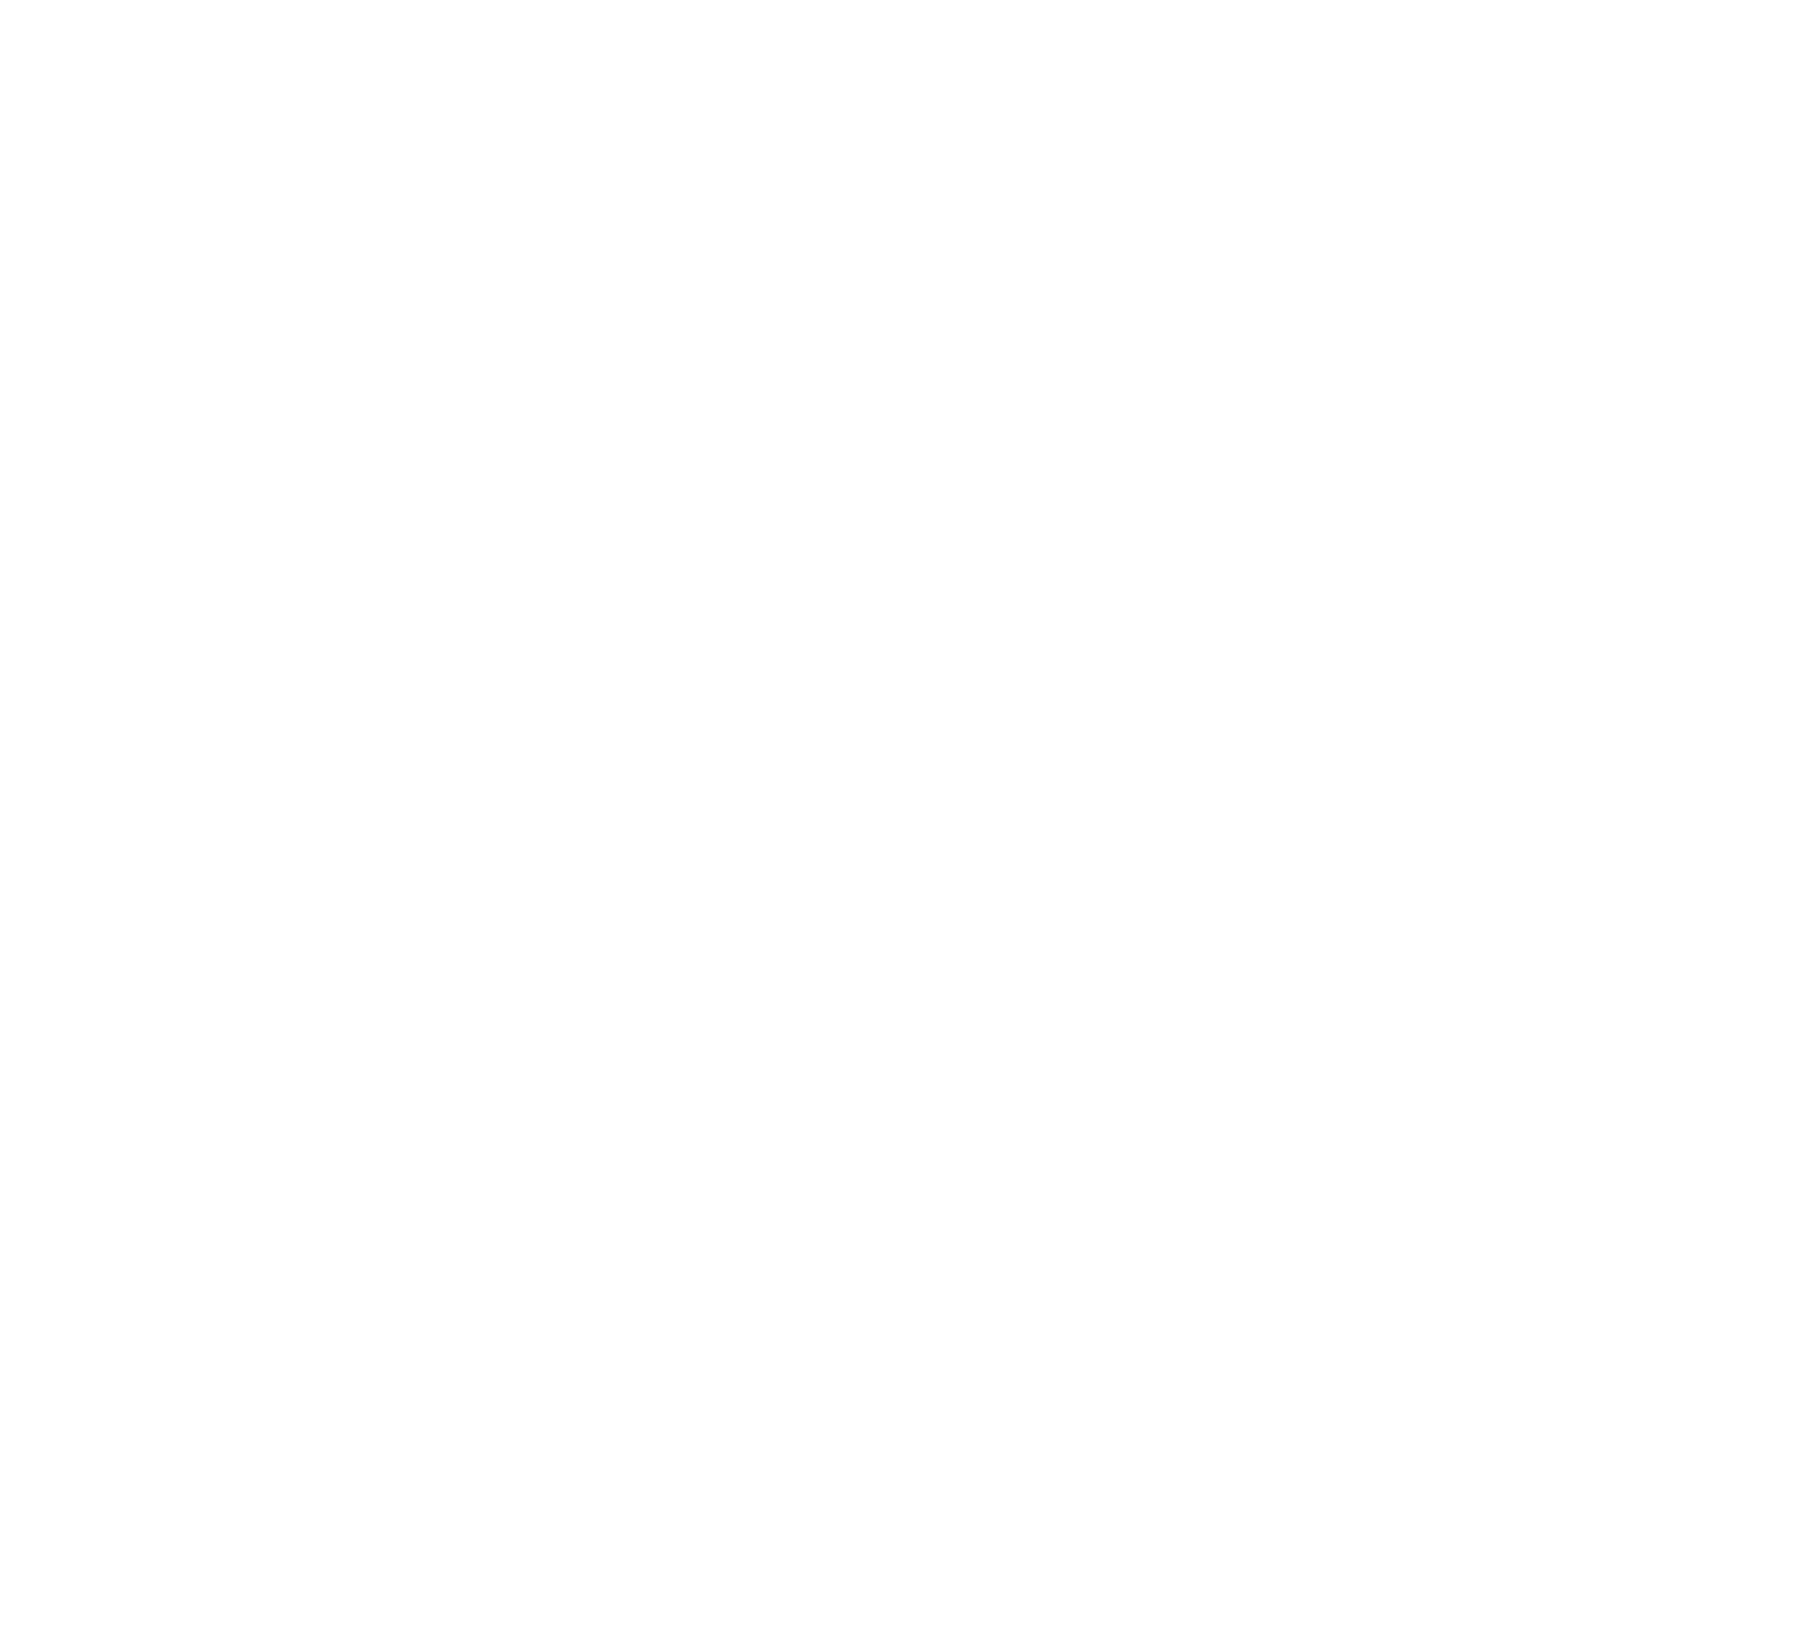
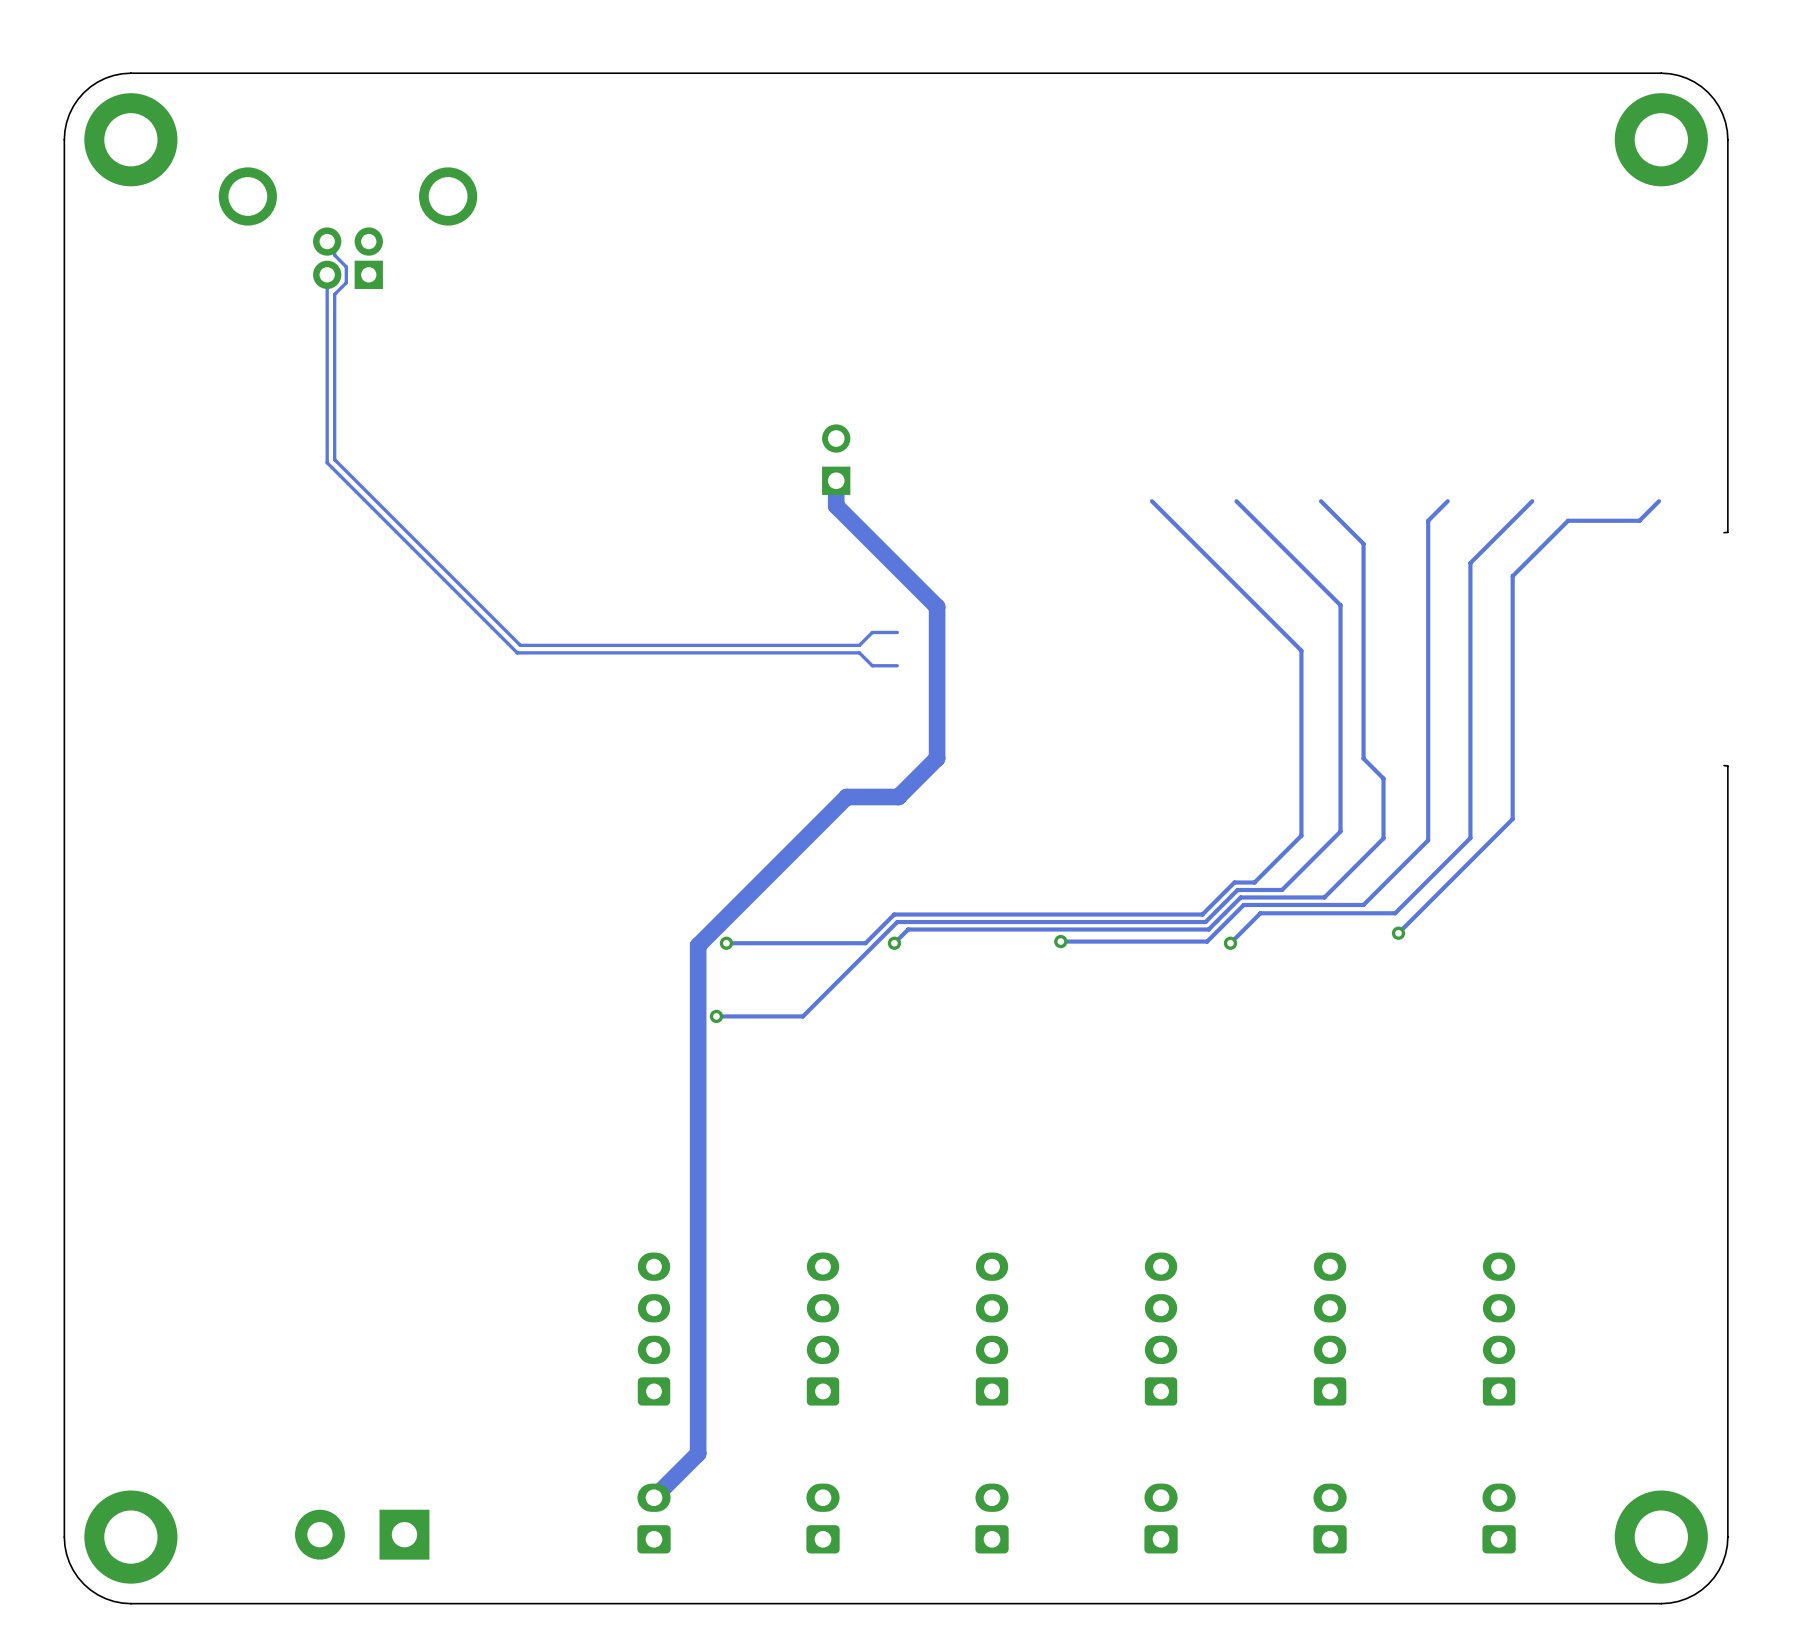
part: none -> (130, 139)
part: none -> (1661, 139)
part: none -> (347, 228)
track: none -> (327, 241) (334, 249) (334, 255) (346, 266) (346, 282) (334, 294) (334, 459) (520, 645) (859, 645) (872, 632) (897, 632)
track: none -> (327, 274) (327, 462) (517, 652) (859, 652) (872, 665) (897, 665)
part: none -> (836, 459)
track: none -> (836, 480) (836, 505) (937, 606) (937, 758) (898, 797) (846, 797) (698, 945) (698, 1453) (654, 1497)
track: none -> (1151, 501) (1301, 650) (1301, 835) (1254, 882) (1234, 882) (1202, 914) (894, 914) (865, 943) (726, 943)
track: none -> (1236, 501) (1340, 605) (1340, 831) (1282, 889) (1237, 889) (1205, 922) (897, 922) (802, 1016) (716, 1016)
track: none -> (1320, 501) (1363, 543) (1363, 758) (1383, 778) (1383, 838) (1324, 897) (1240, 897) (1208, 929) (908, 929) (894, 943)
track: none -> (1447, 501) (1428, 520) (1428, 840) (1363, 904) (1243, 904) (1207, 941) (1060, 941)
track: none -> (1532, 501) (1470, 563) (1470, 838) (1395, 913) (1260, 913) (1230, 943)
track: none -> (1658, 501) (1639, 520) (1568, 520) (1512, 576) (1512, 819) (1398, 933)
board edge: none -> (1724, 532) (1727, 532) (1727, 131) (1718, 106) (1708, 92) (1694, 82) (1678, 75) (1661, 73) (130, 73) (113, 75) (97, 82) (83, 92) (73, 106) (66, 122) (64, 139) (64, 1537) (69, 1562) (78, 1577) (90, 1589) (105, 1598) (130, 1603) (1661, 1603) (1686, 1598) (1701, 1589) (1718, 1570) (1725, 1554) (1727, 1537) (1727, 766) (1724, 765)
via: none -> (1398, 933)
via: none -> (1060, 941)
via: none -> (726, 943)
via: none -> (894, 943)
via: none -> (1230, 943)
via: none -> (716, 1016)
part: none -> (654, 1329)
part: none -> (823, 1329)
part: none -> (992, 1329)
part: none -> (1161, 1329)
part: none -> (1330, 1329)
part: none -> (1499, 1329)
part: none -> (654, 1518)
part: none -> (823, 1518)
part: none -> (992, 1518)
part: none -> (1161, 1518)
part: none -> (1330, 1518)
part: none -> (1499, 1518)
part: none -> (362, 1534)
part: none -> (130, 1537)
part: none -> (1661, 1537)

